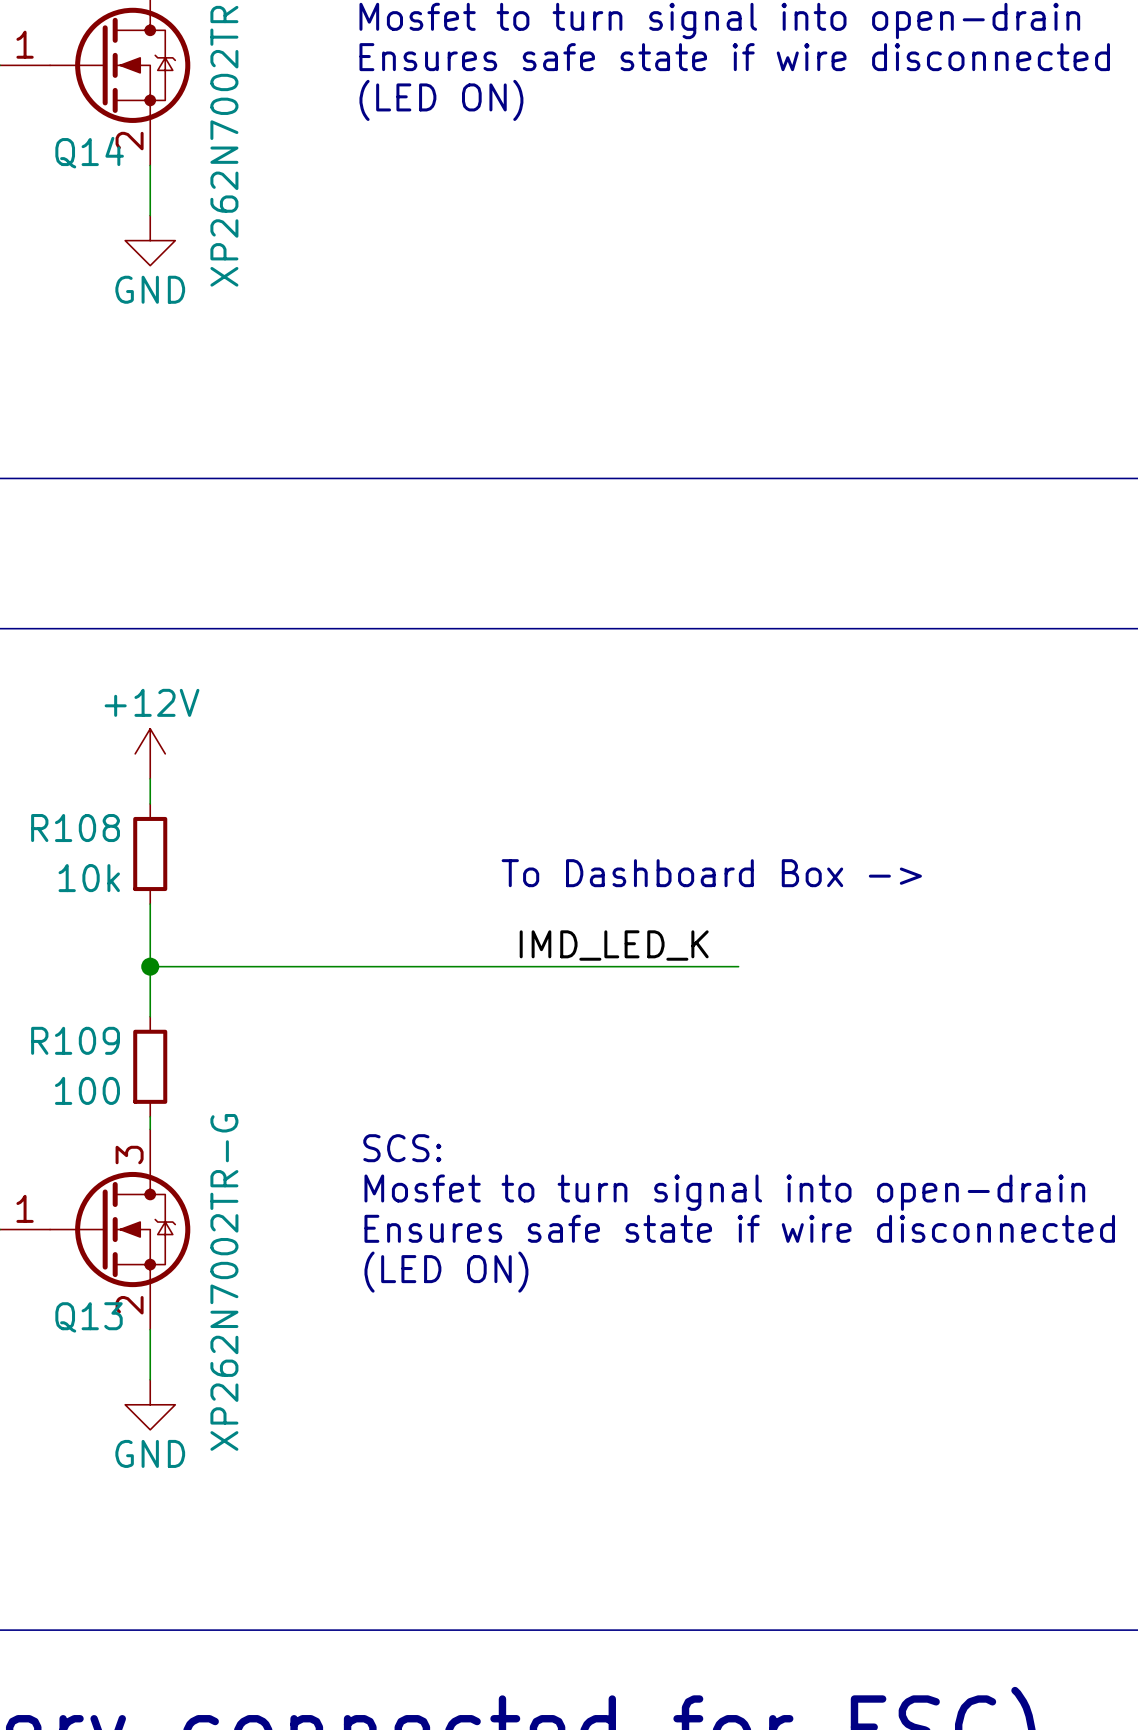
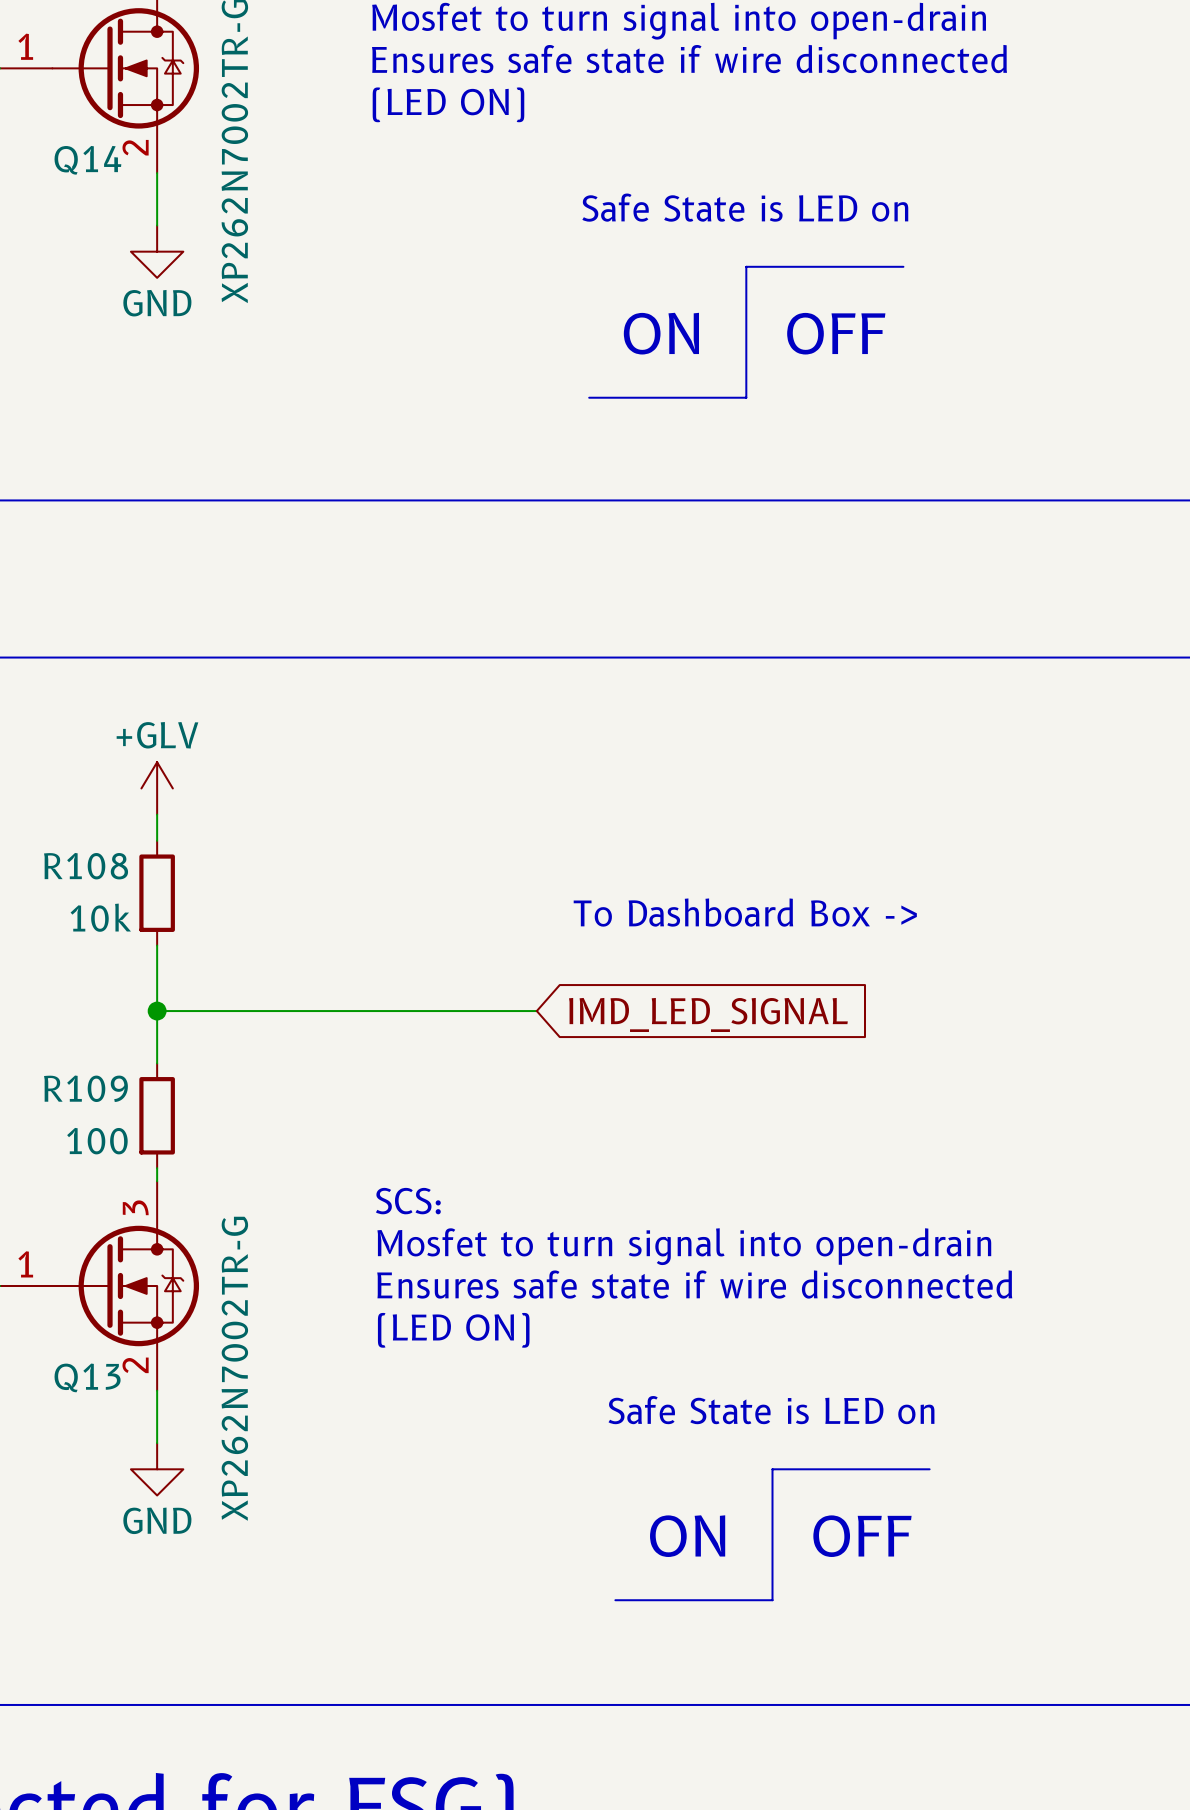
text: none -> Safe State is LED on (745, 207)
line: none -> (903, 266) (746, 266) (746, 397) (589, 397)
text: none -> ON (661, 333)
text: none -> OFF (836, 333)
power symbol: +12V (150, 753) -> +GLV (157, 788)
label: IMD_LED_K (614, 945) -> none
wire: (513, 966) (738, 966) -> none
global label: none -> IMD_LED_SIGNAL (708, 1014)
text: none -> Safe State is LED on (771, 1410)
line: none -> (929, 1469) (772, 1469) (772, 1600) (615, 1600)
text: none -> ON (687, 1536)
text: none -> OFF (862, 1536)

